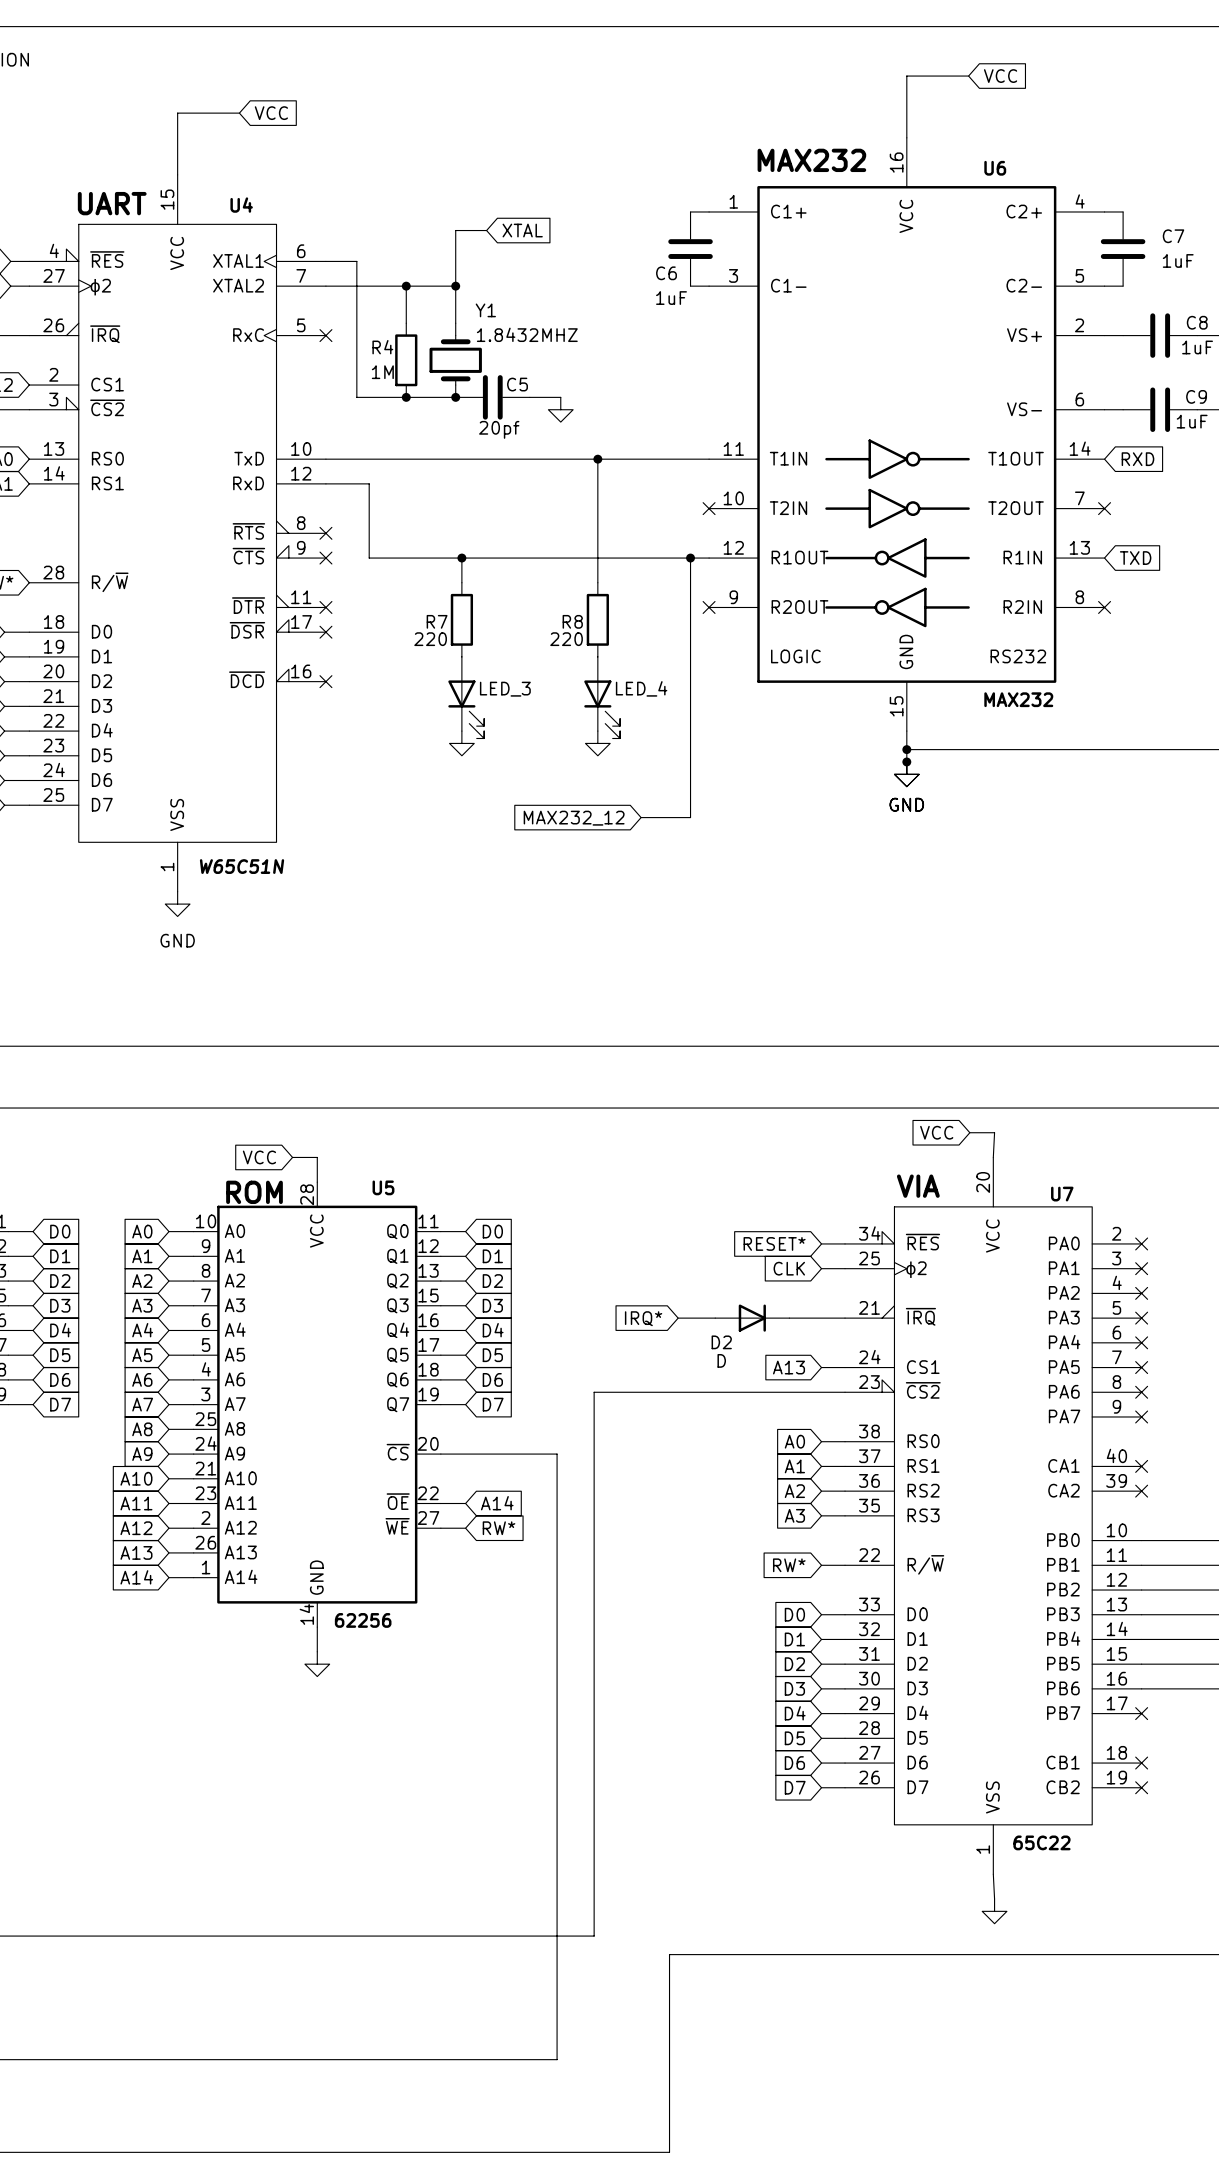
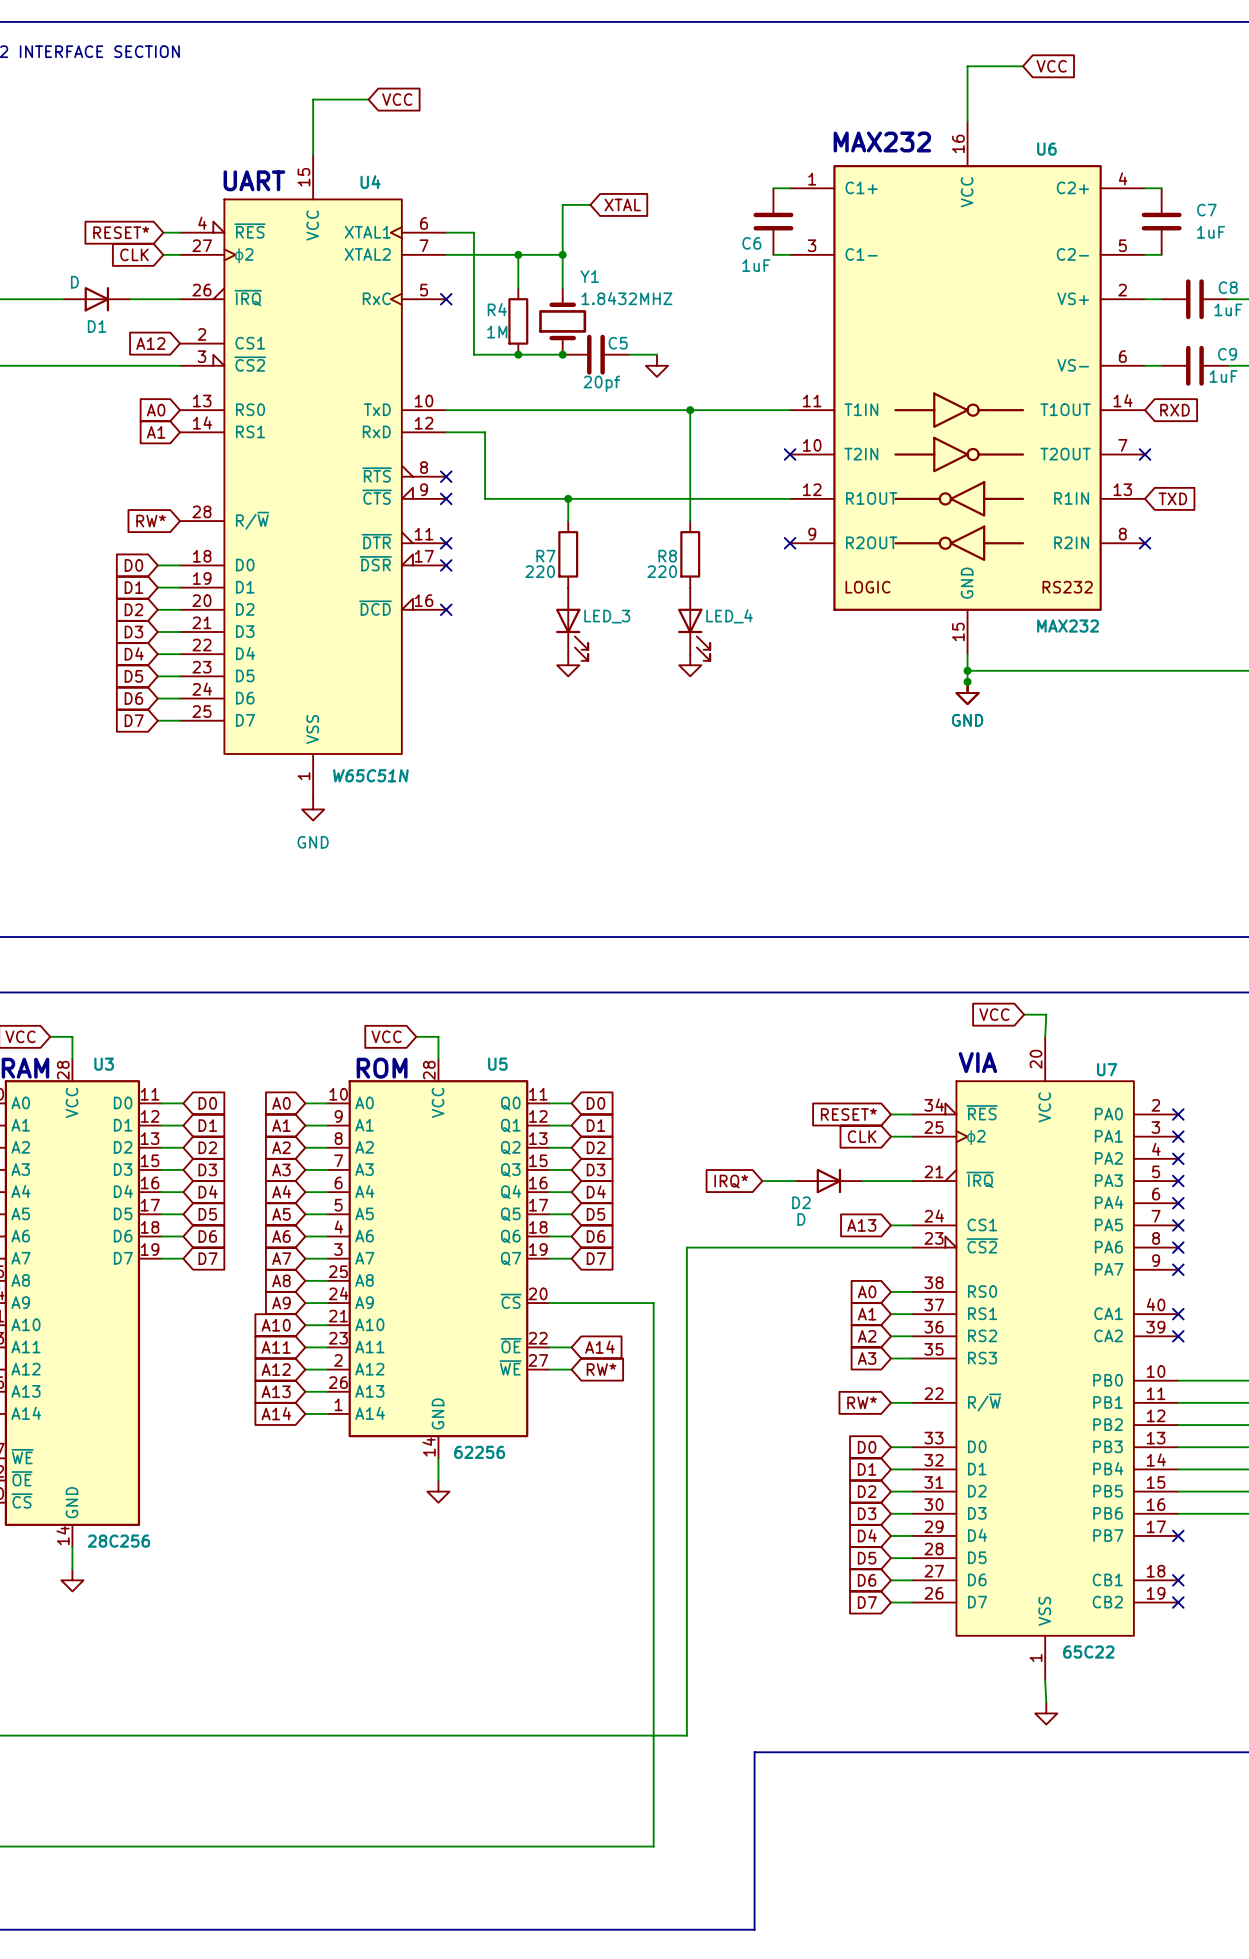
wire: (690, 558) (690, 817) (641, 817) -> none
junction: (690, 558) -> none
global label: MAX232_12 (574, 818) -> none

